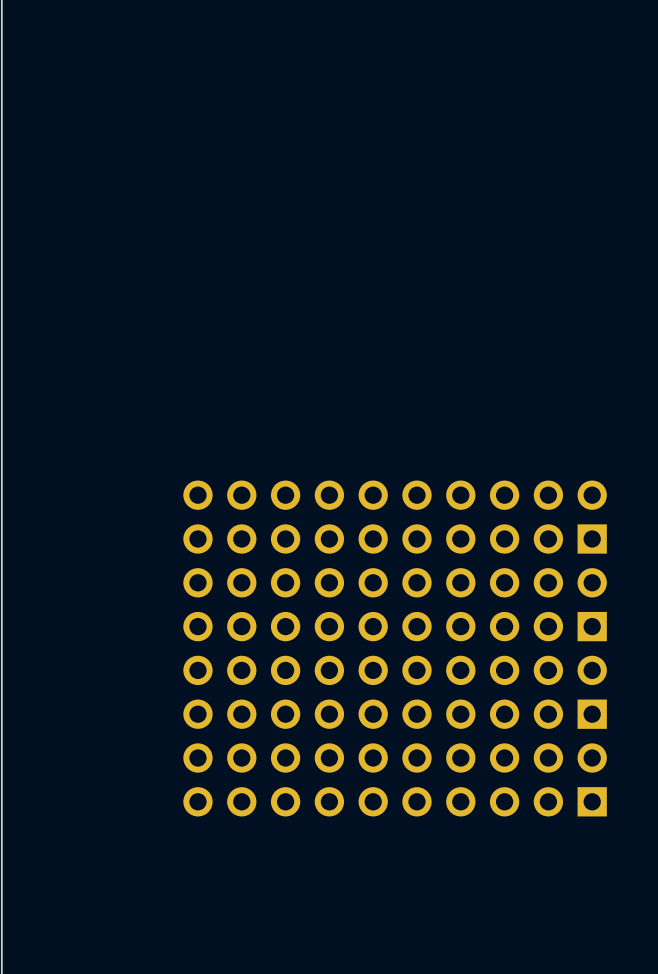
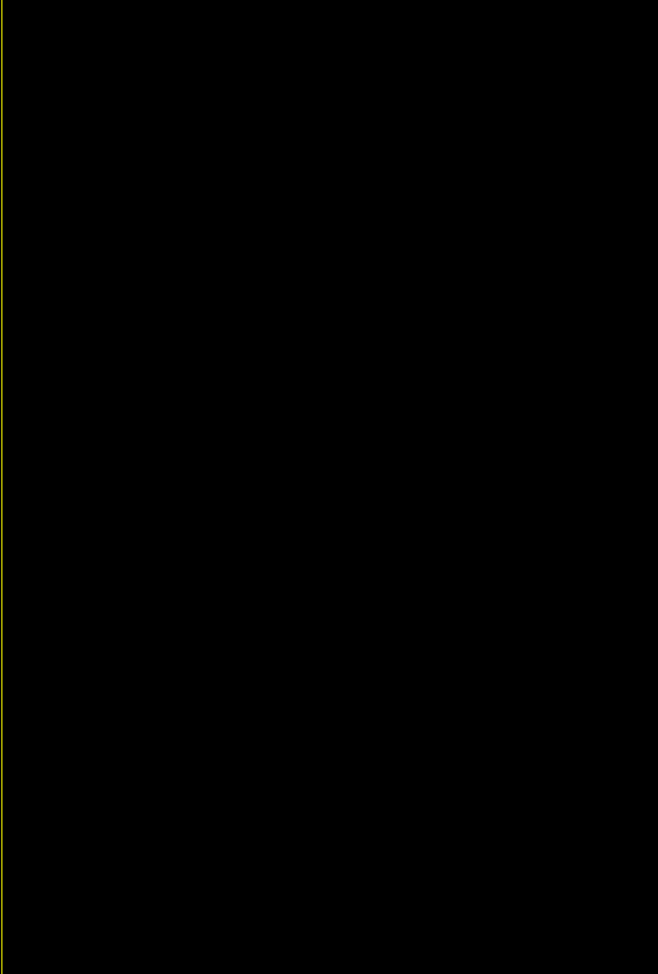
part: (395, 517) -> none
part: (395, 604) -> none
part: (395, 692) -> none
part: (395, 779) -> none

